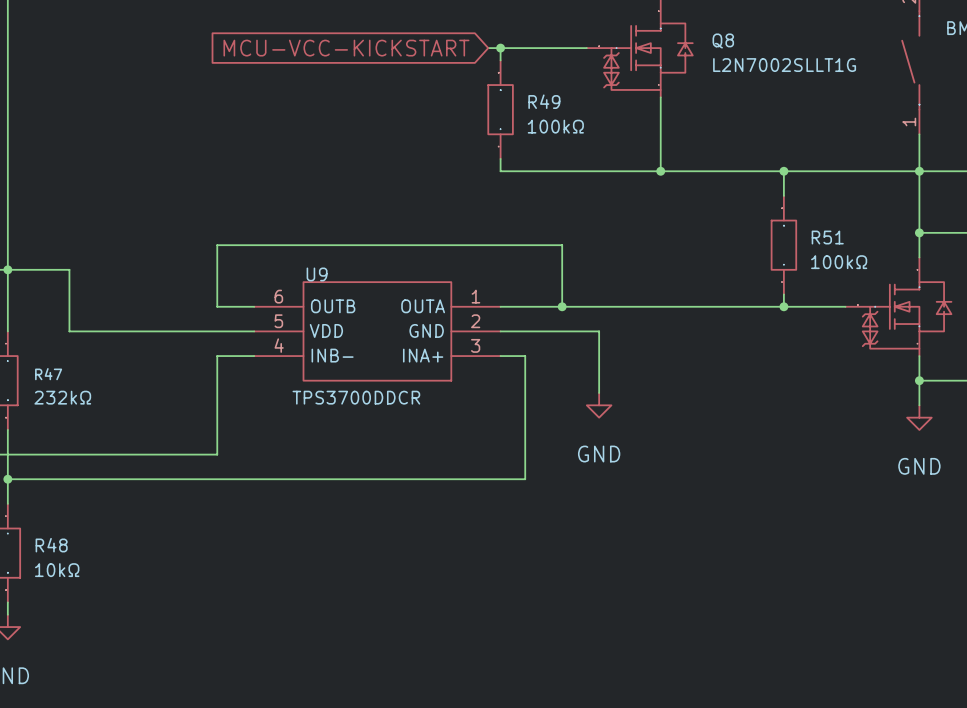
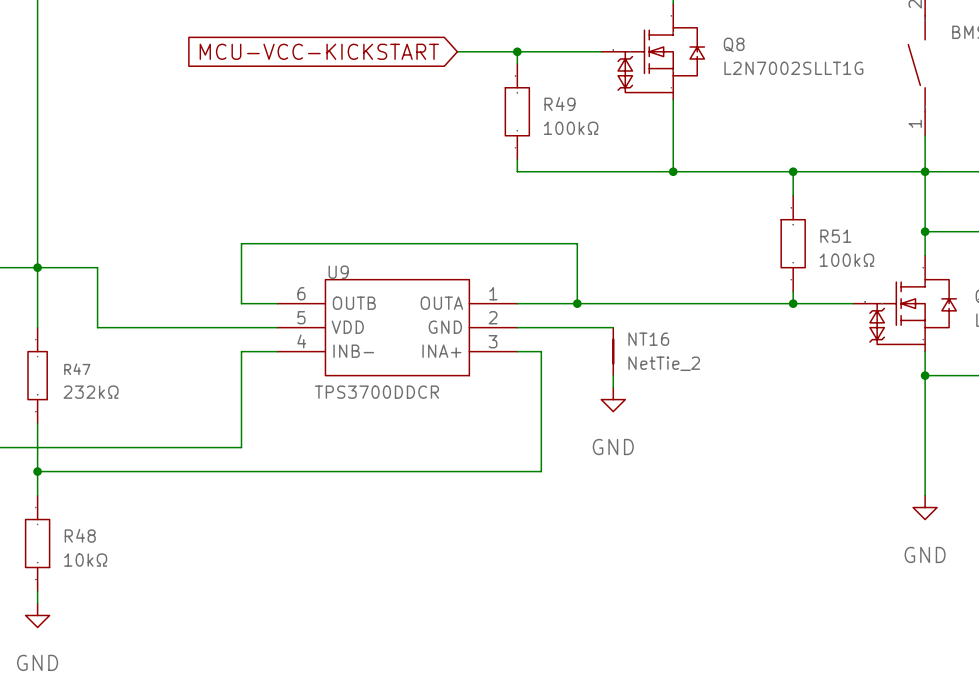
global label position: MCU-VCC-KICKSTART (346, 48) -> MCU-VCC-KICKSTART (319, 51)
wire: none -> (457, 51) (505, 51)
NT16: none -> NetTie_2 (613, 351)
wire: none -> (925, 399) (925, 495)
power symbol position: GND (919, 417) -> GND (925, 507)

